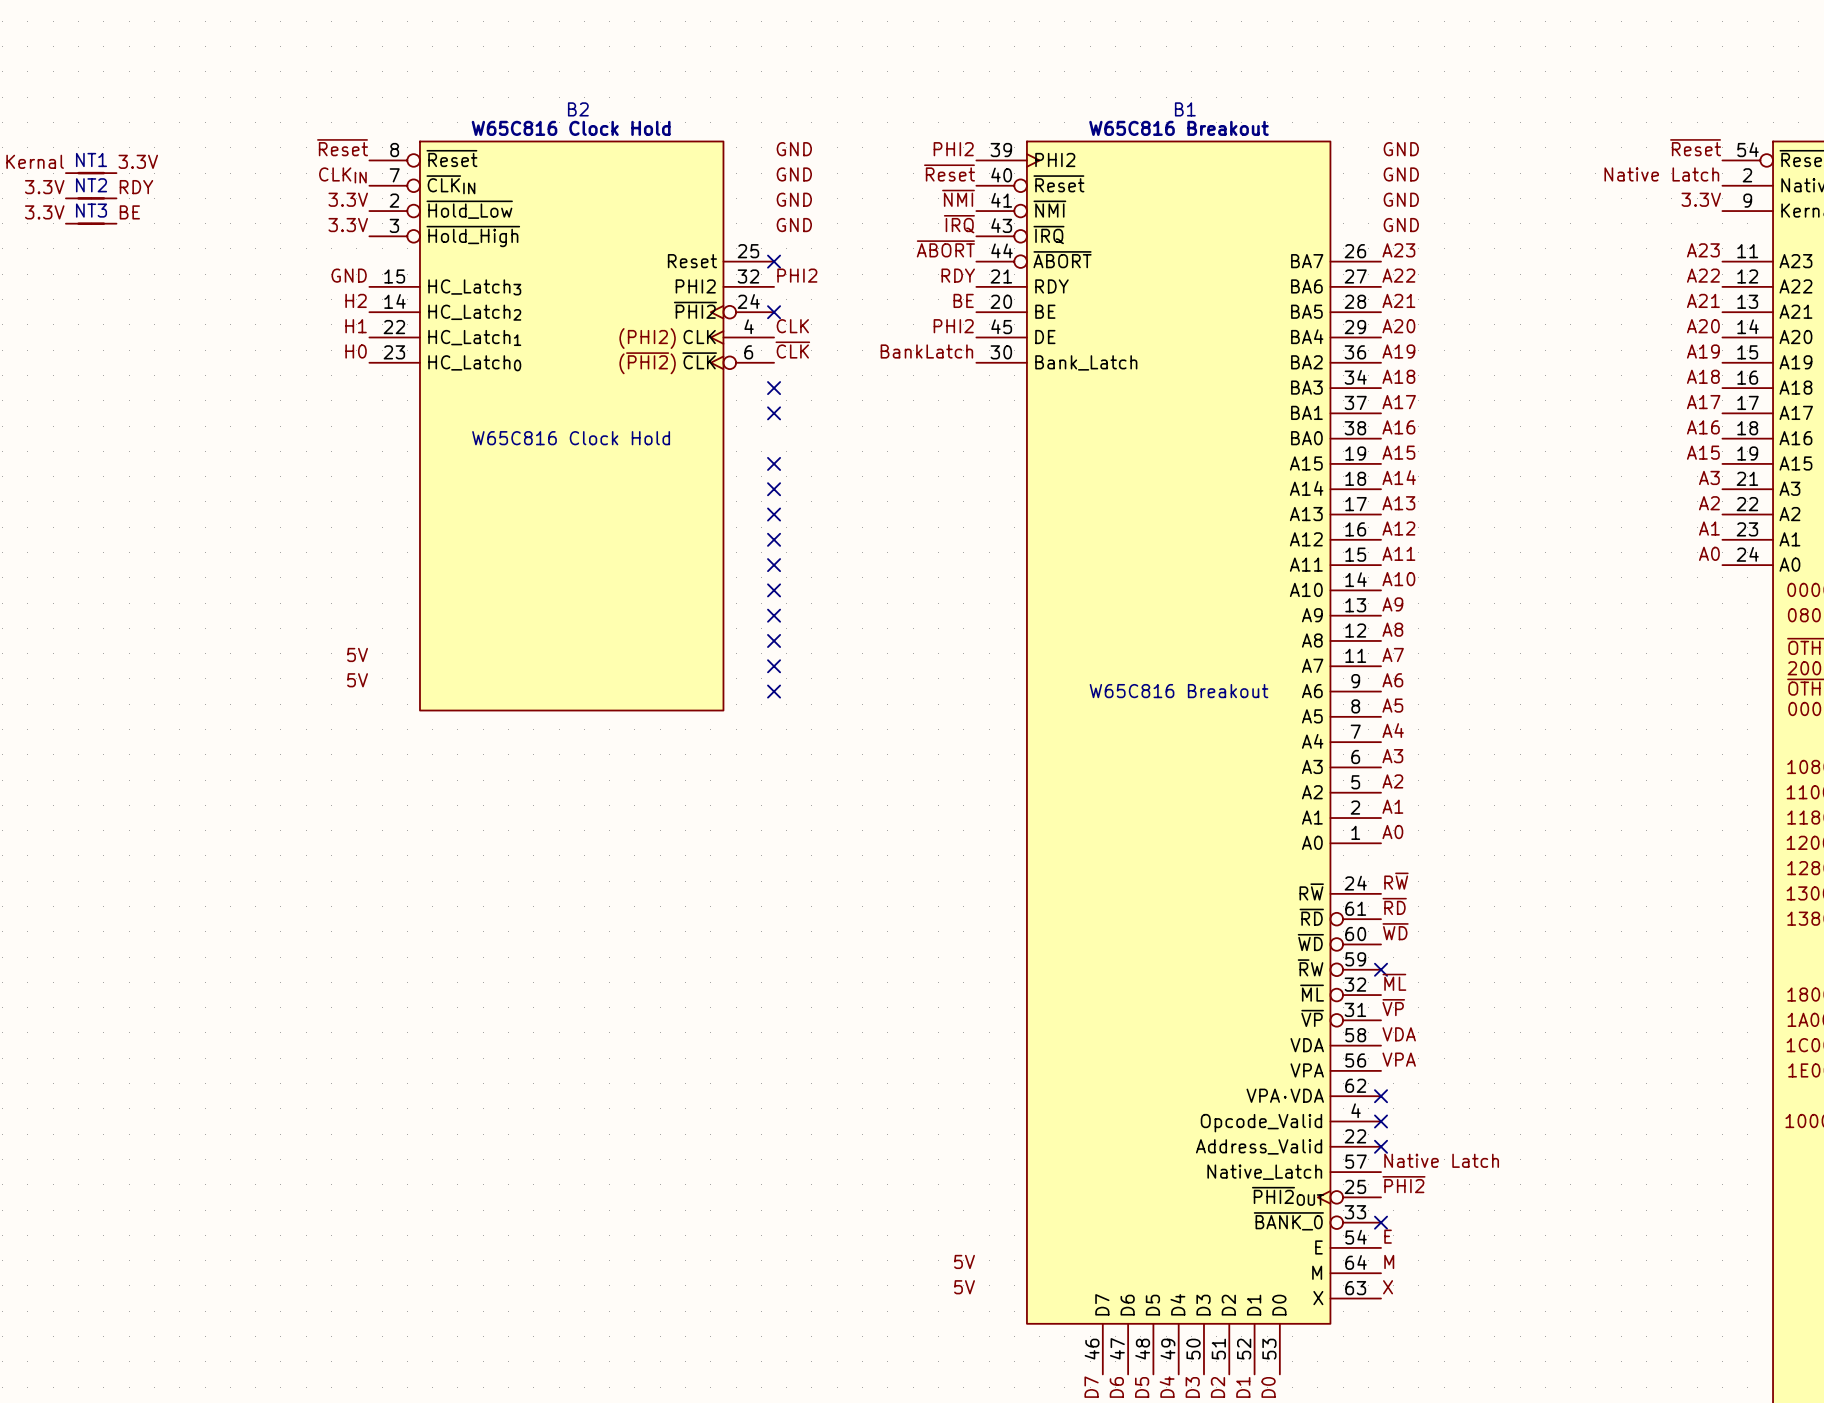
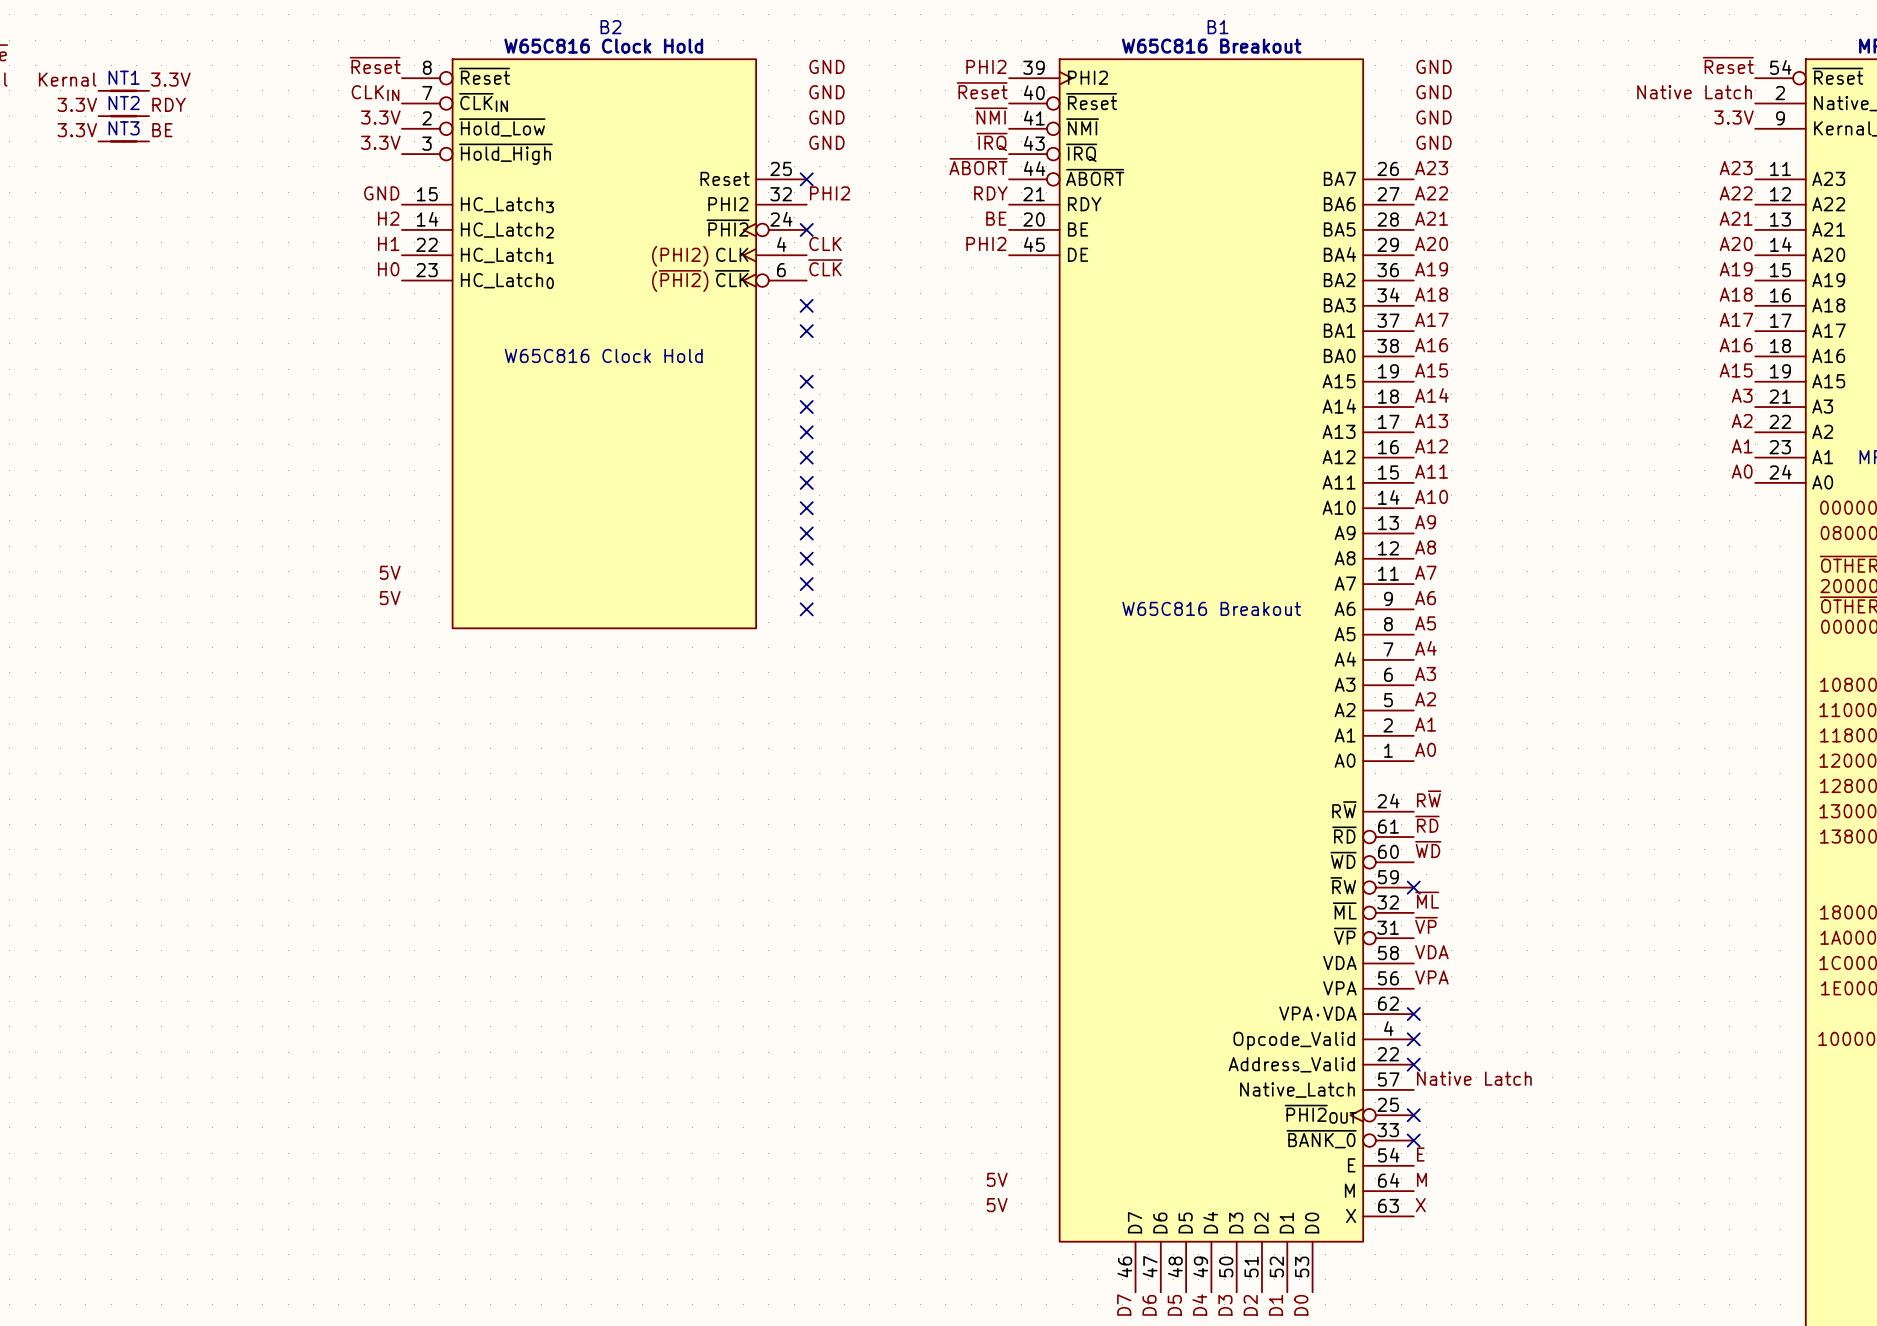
B1 symbol: [976, 140, 1382, 1375] -> [1009, 58, 1414, 1293]
label: BankLatch (926, 351) -> none
label: ~{PHI2} (1403, 1184) -> none
no-connect mark: none -> (1413, 1115)

